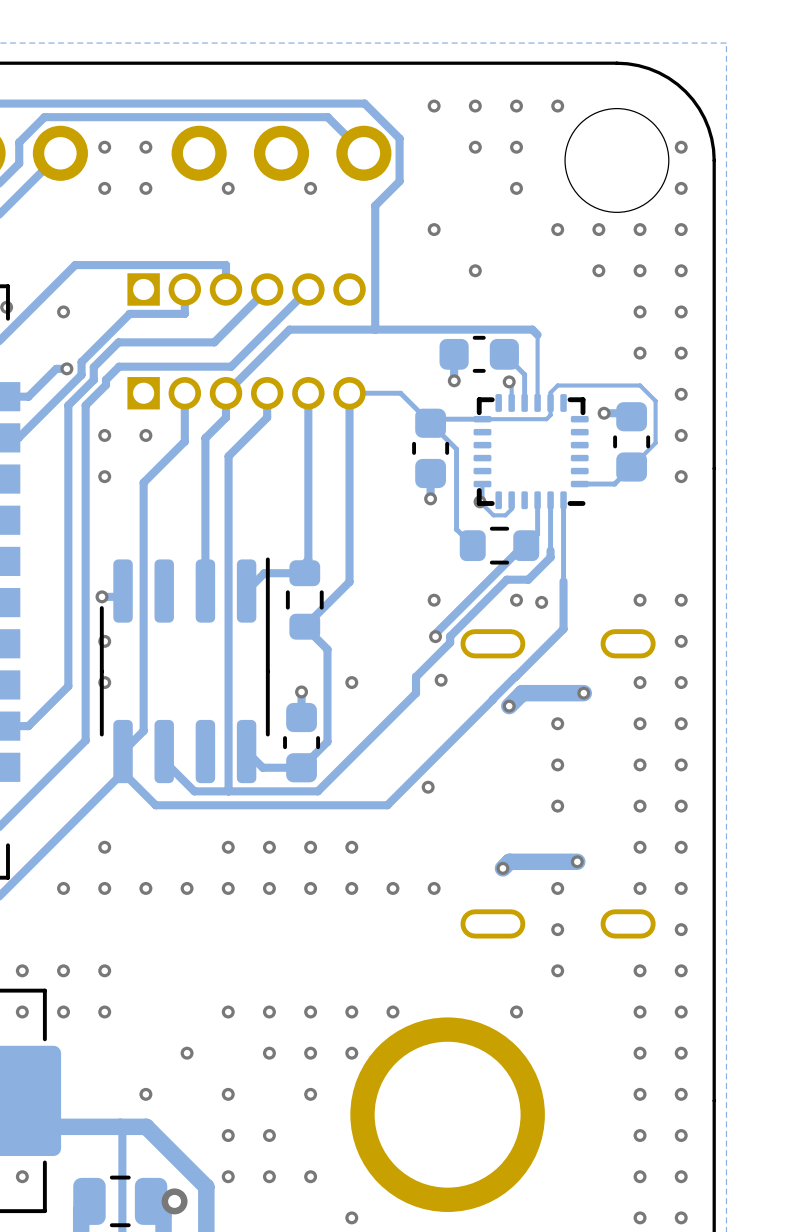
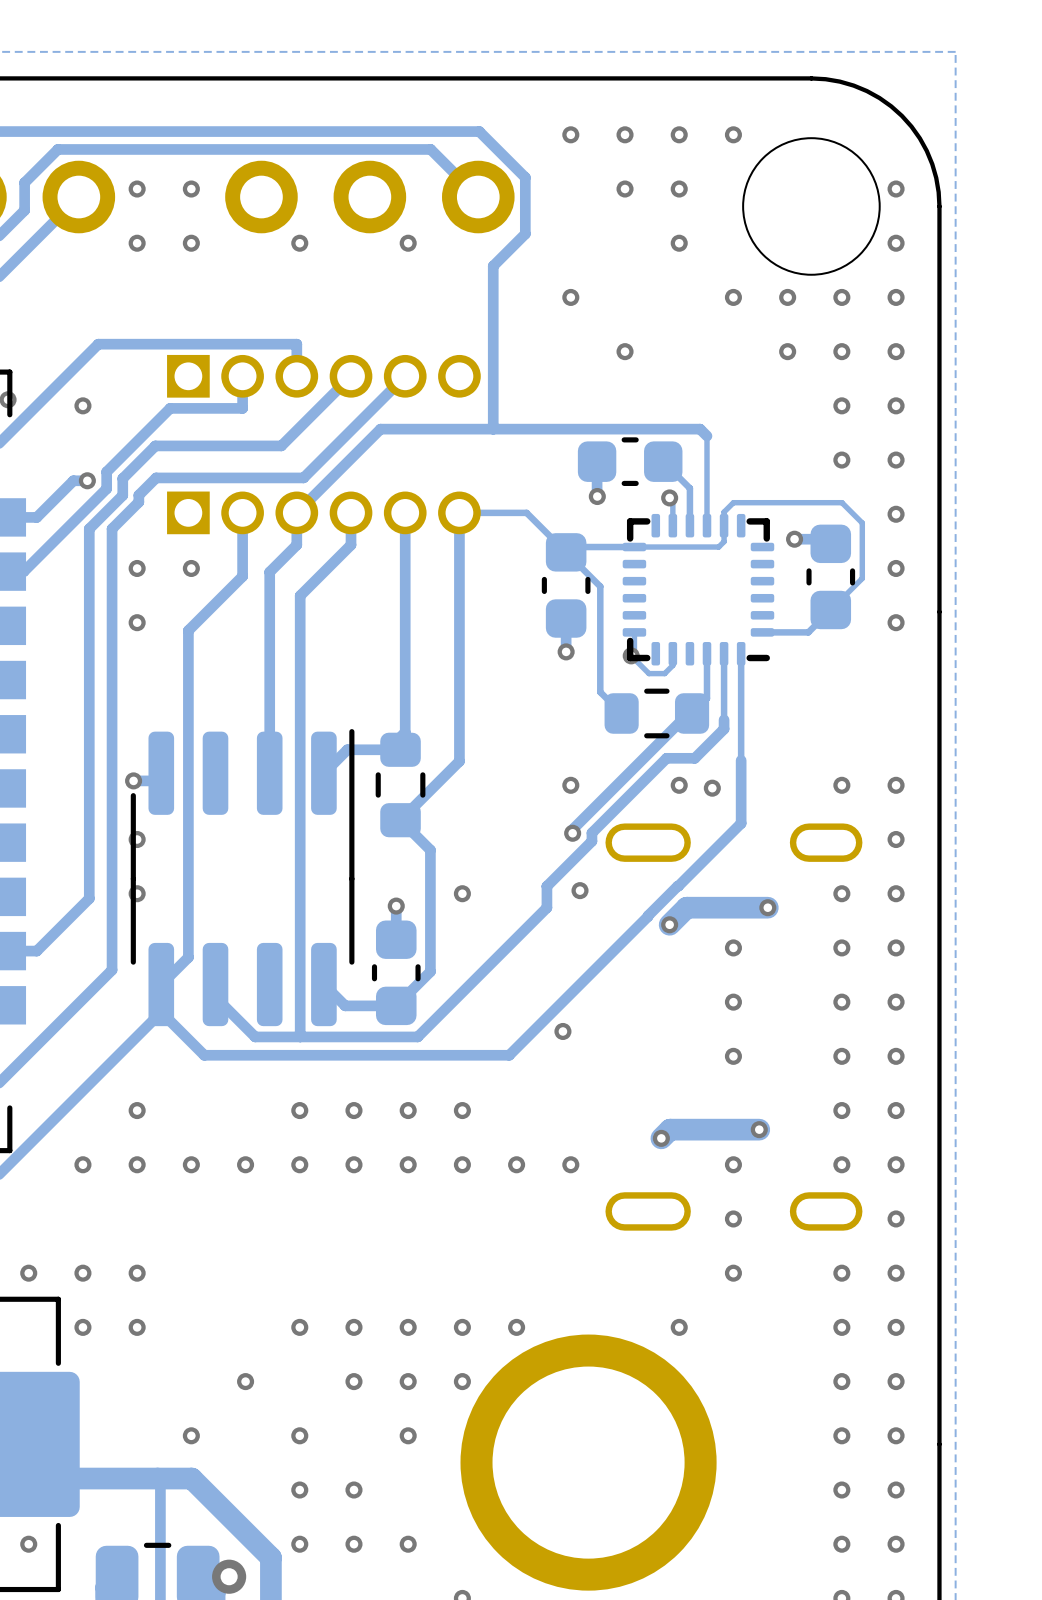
via: (22, 1011) -> none

